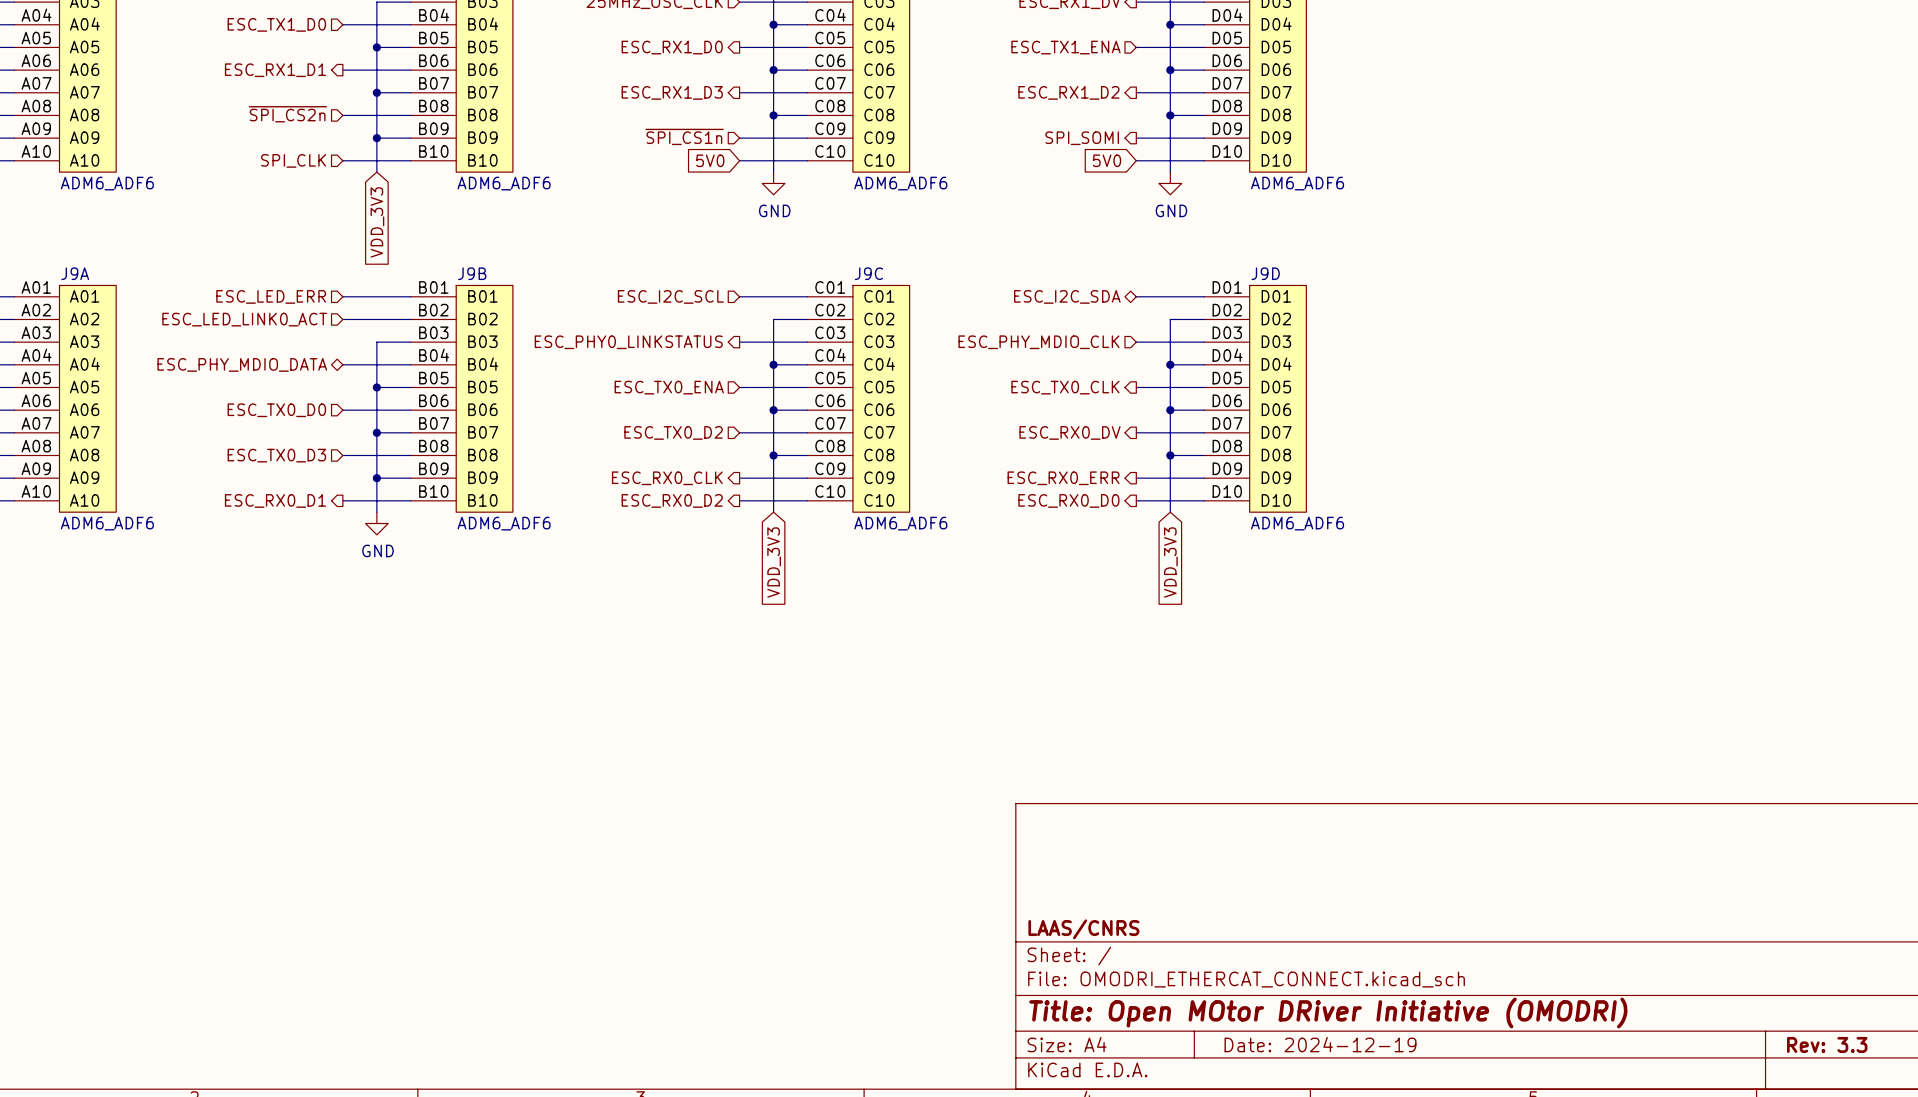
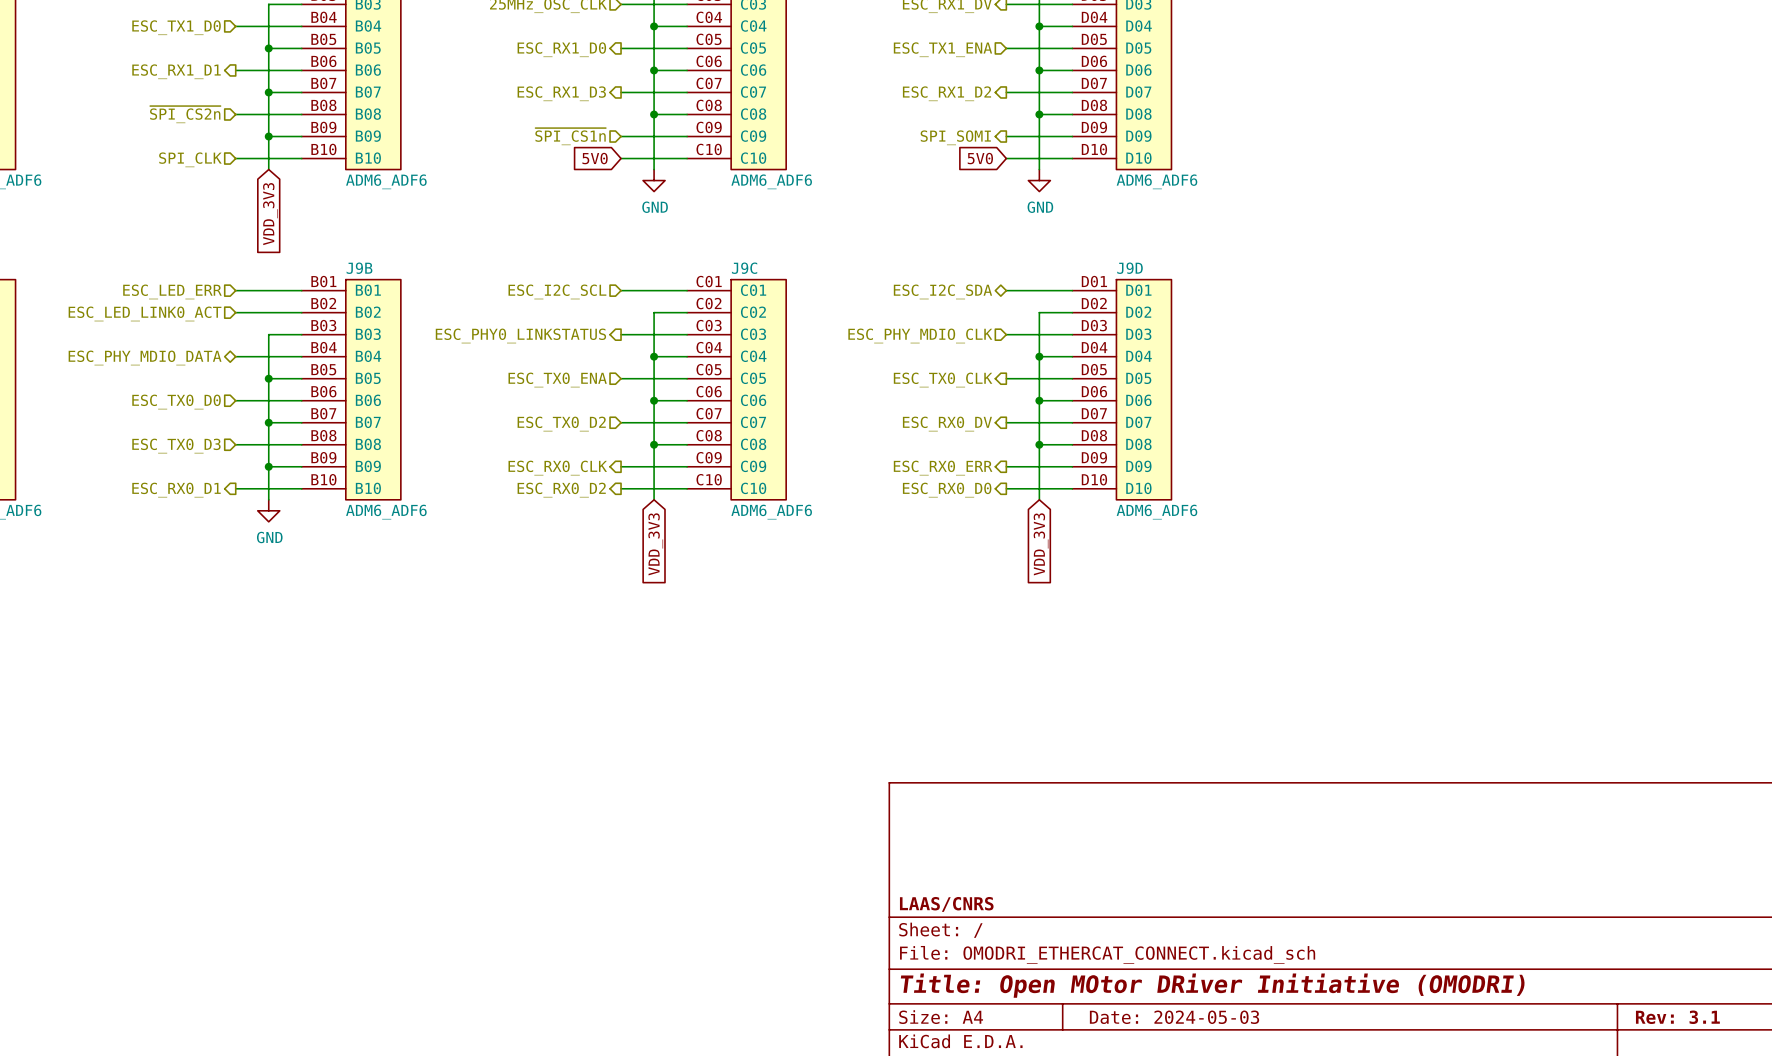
title block: Date: 2024-12-19 (1320, 1044) -> Date: 2024-05-03 (1174, 1017)
title block: Rev: 3.3 (1827, 1044) -> Rev: 3.1 (1677, 1017)

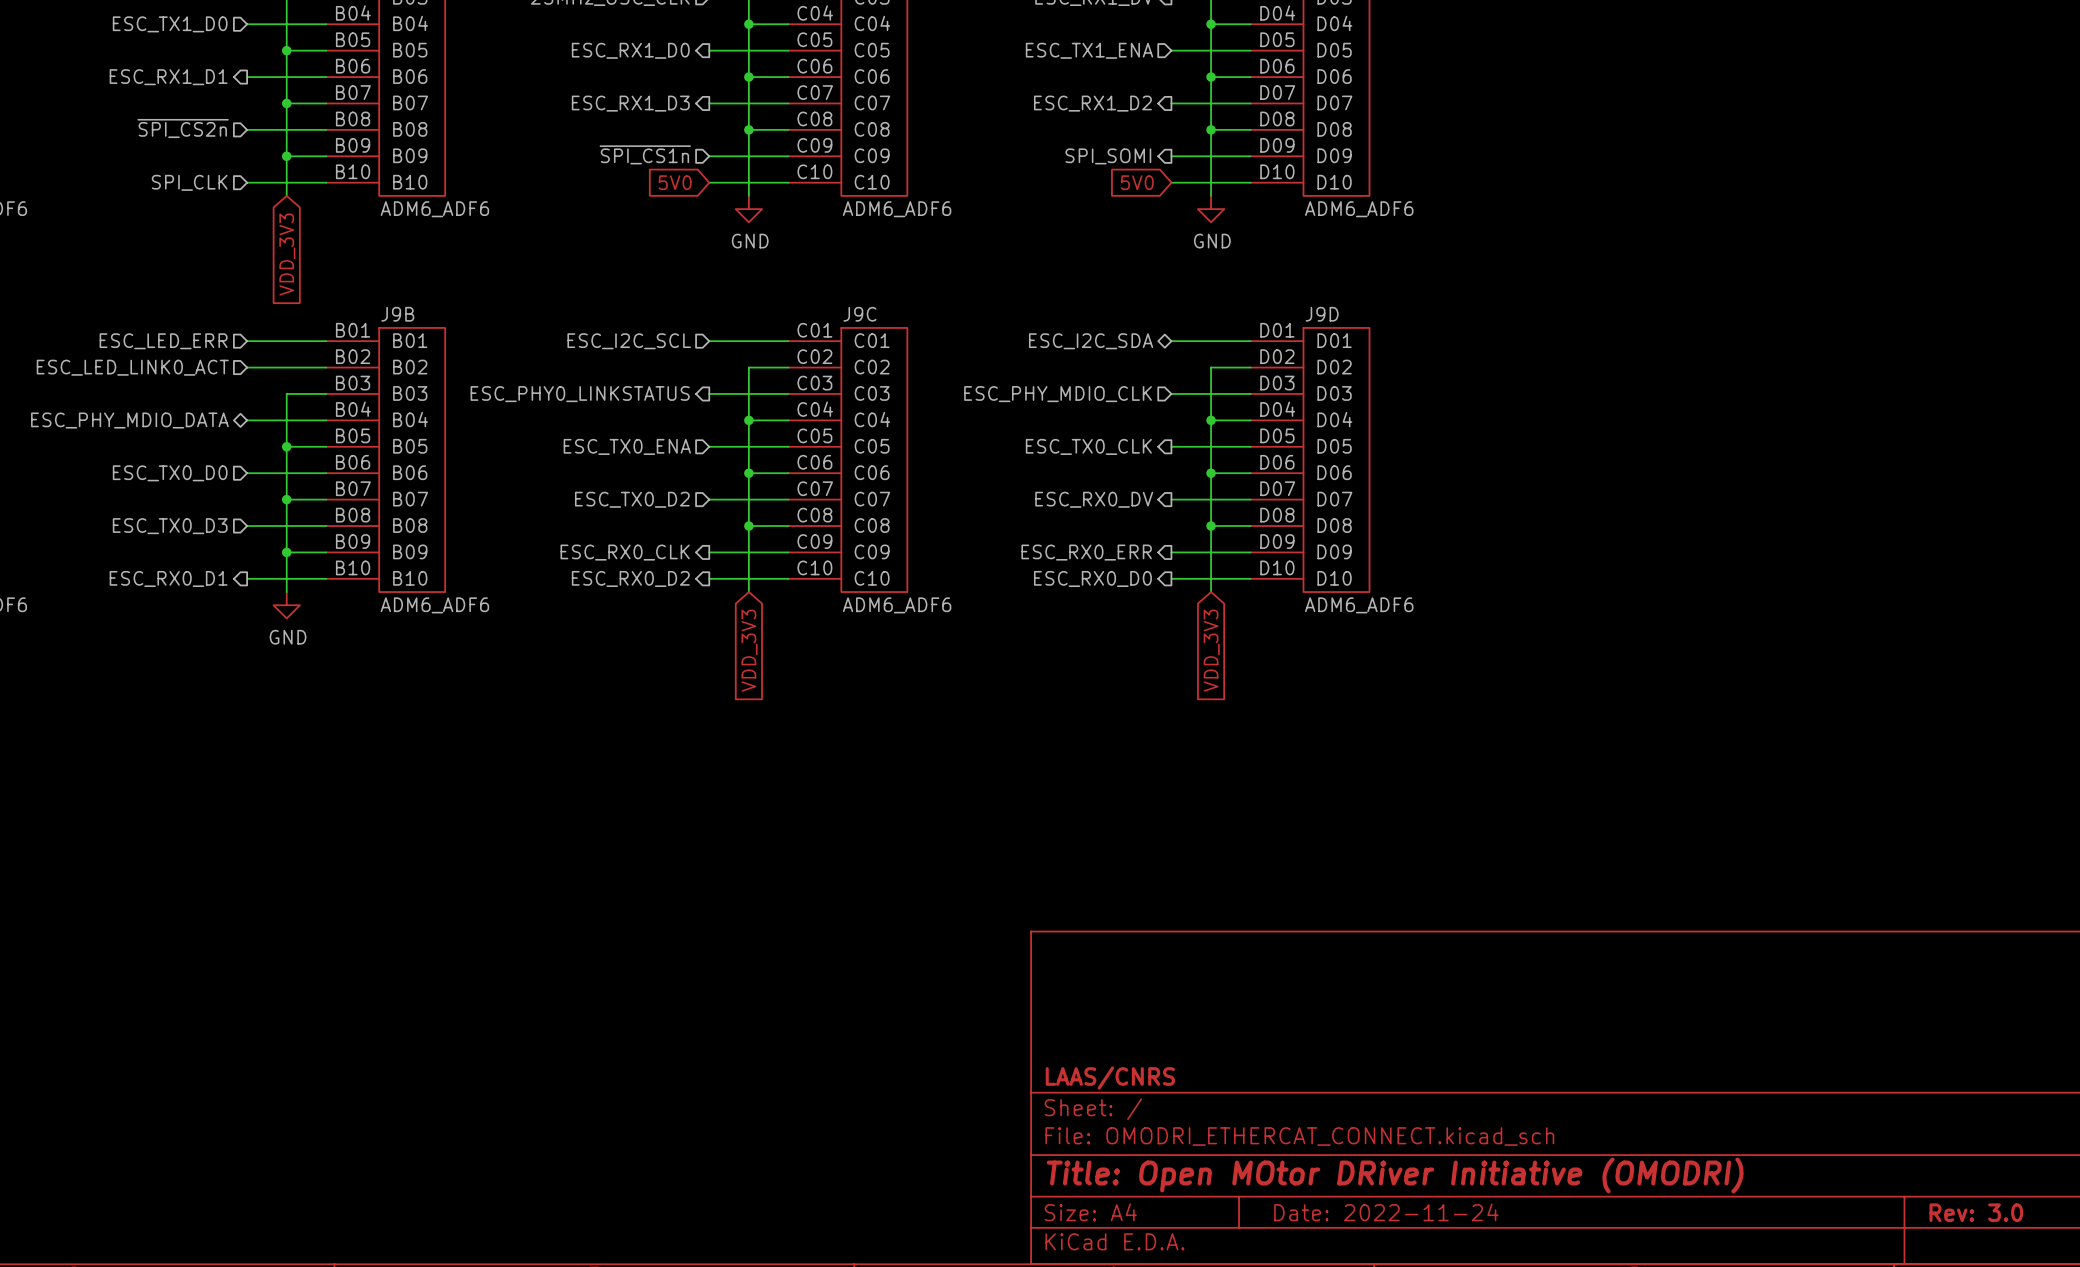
title block: Date: 2024-05-03 (1174, 1017) -> Date: 2022-11-24 (1386, 1212)
title block: Rev: 3.1 (1677, 1017) -> Rev: 3.0 (1976, 1212)

